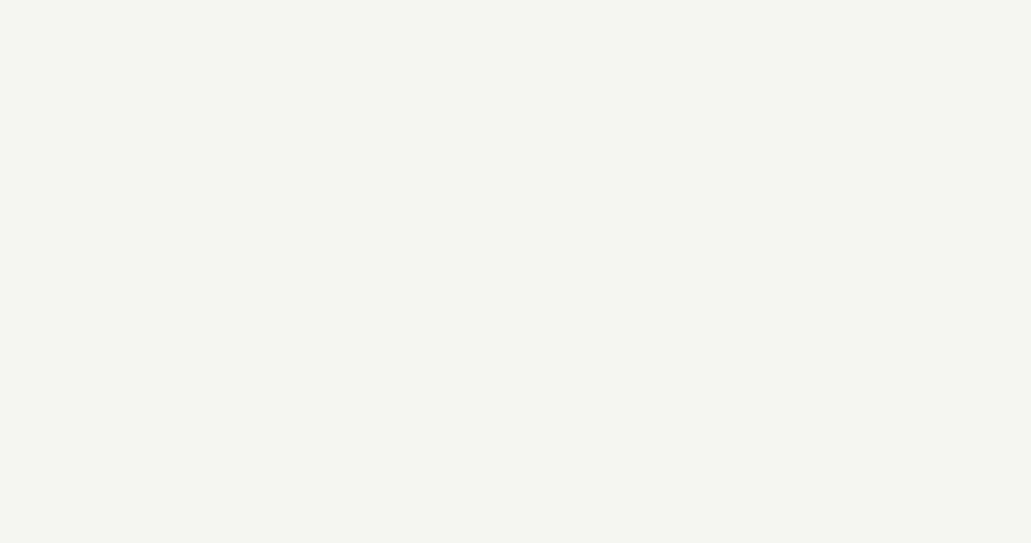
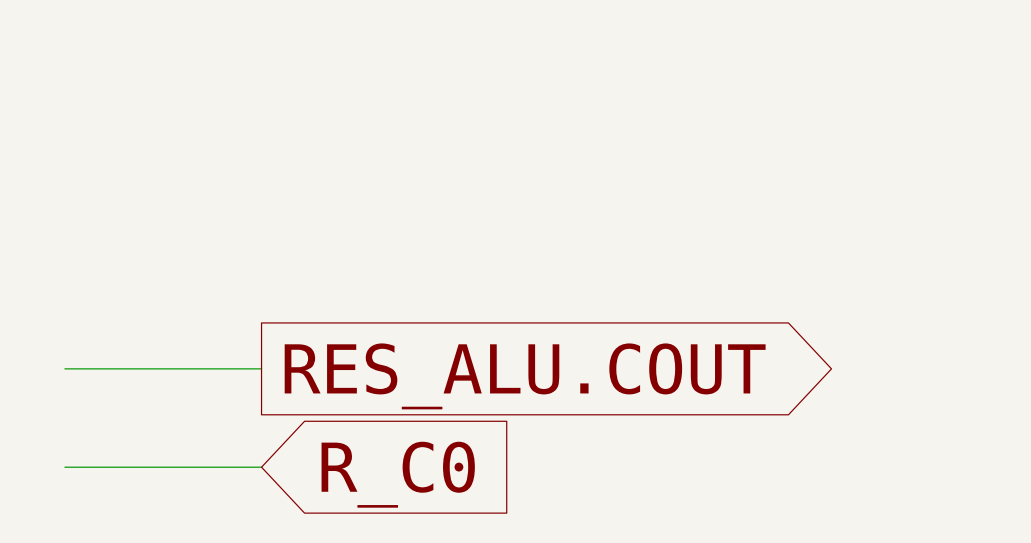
wire: none -> (64, 368) (261, 368)
global label: none -> RES_ALU.COUT (525, 376)
wire: none -> (64, 467) (261, 467)
global label: none -> R_C0 (398, 474)

